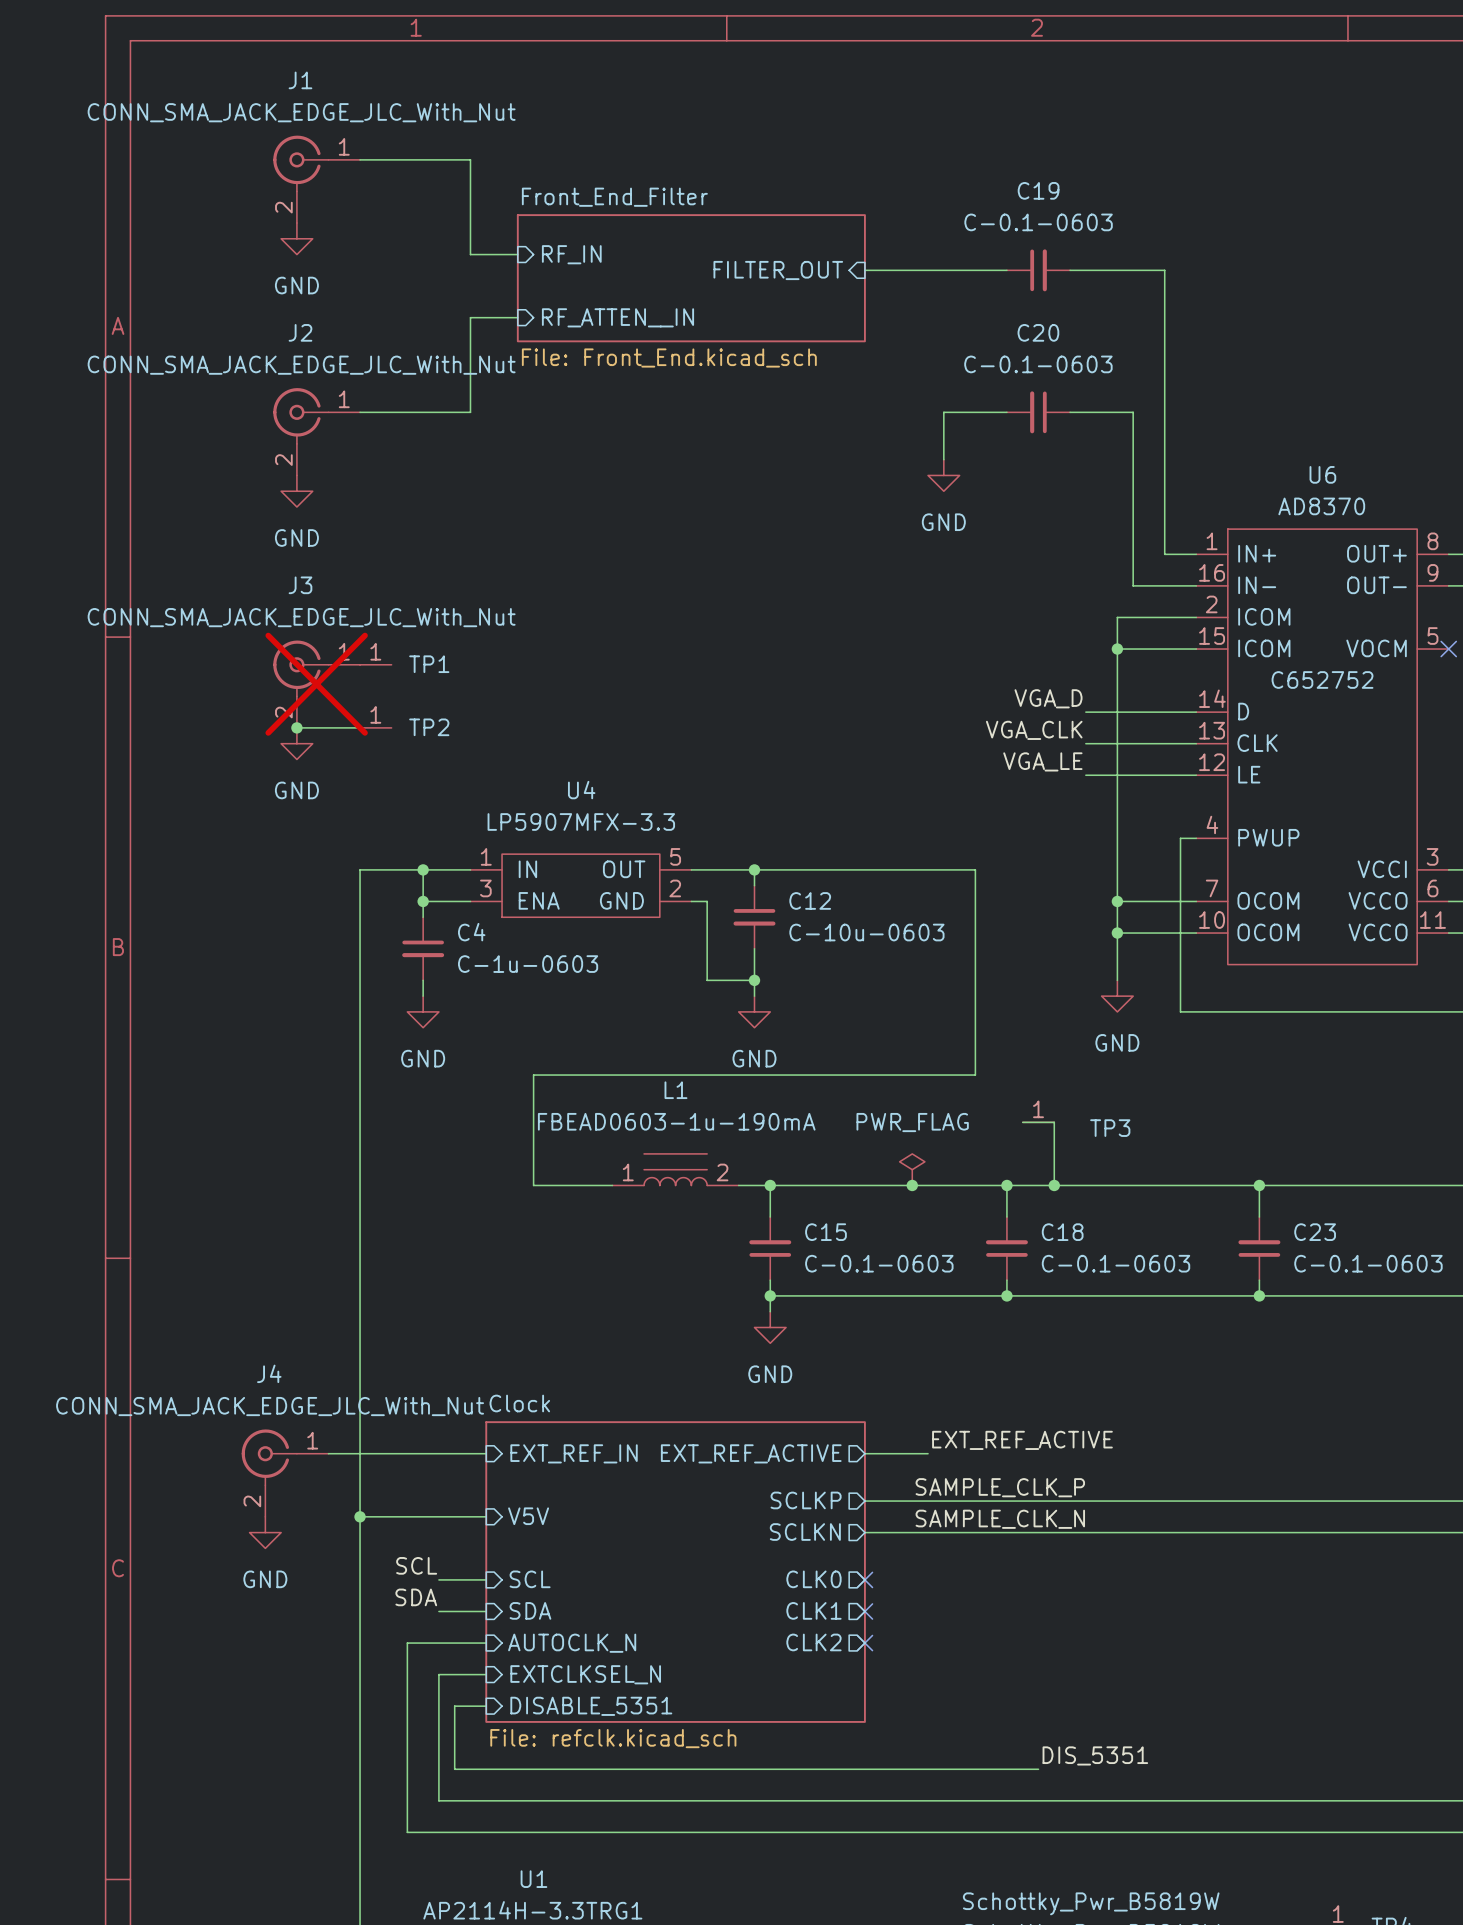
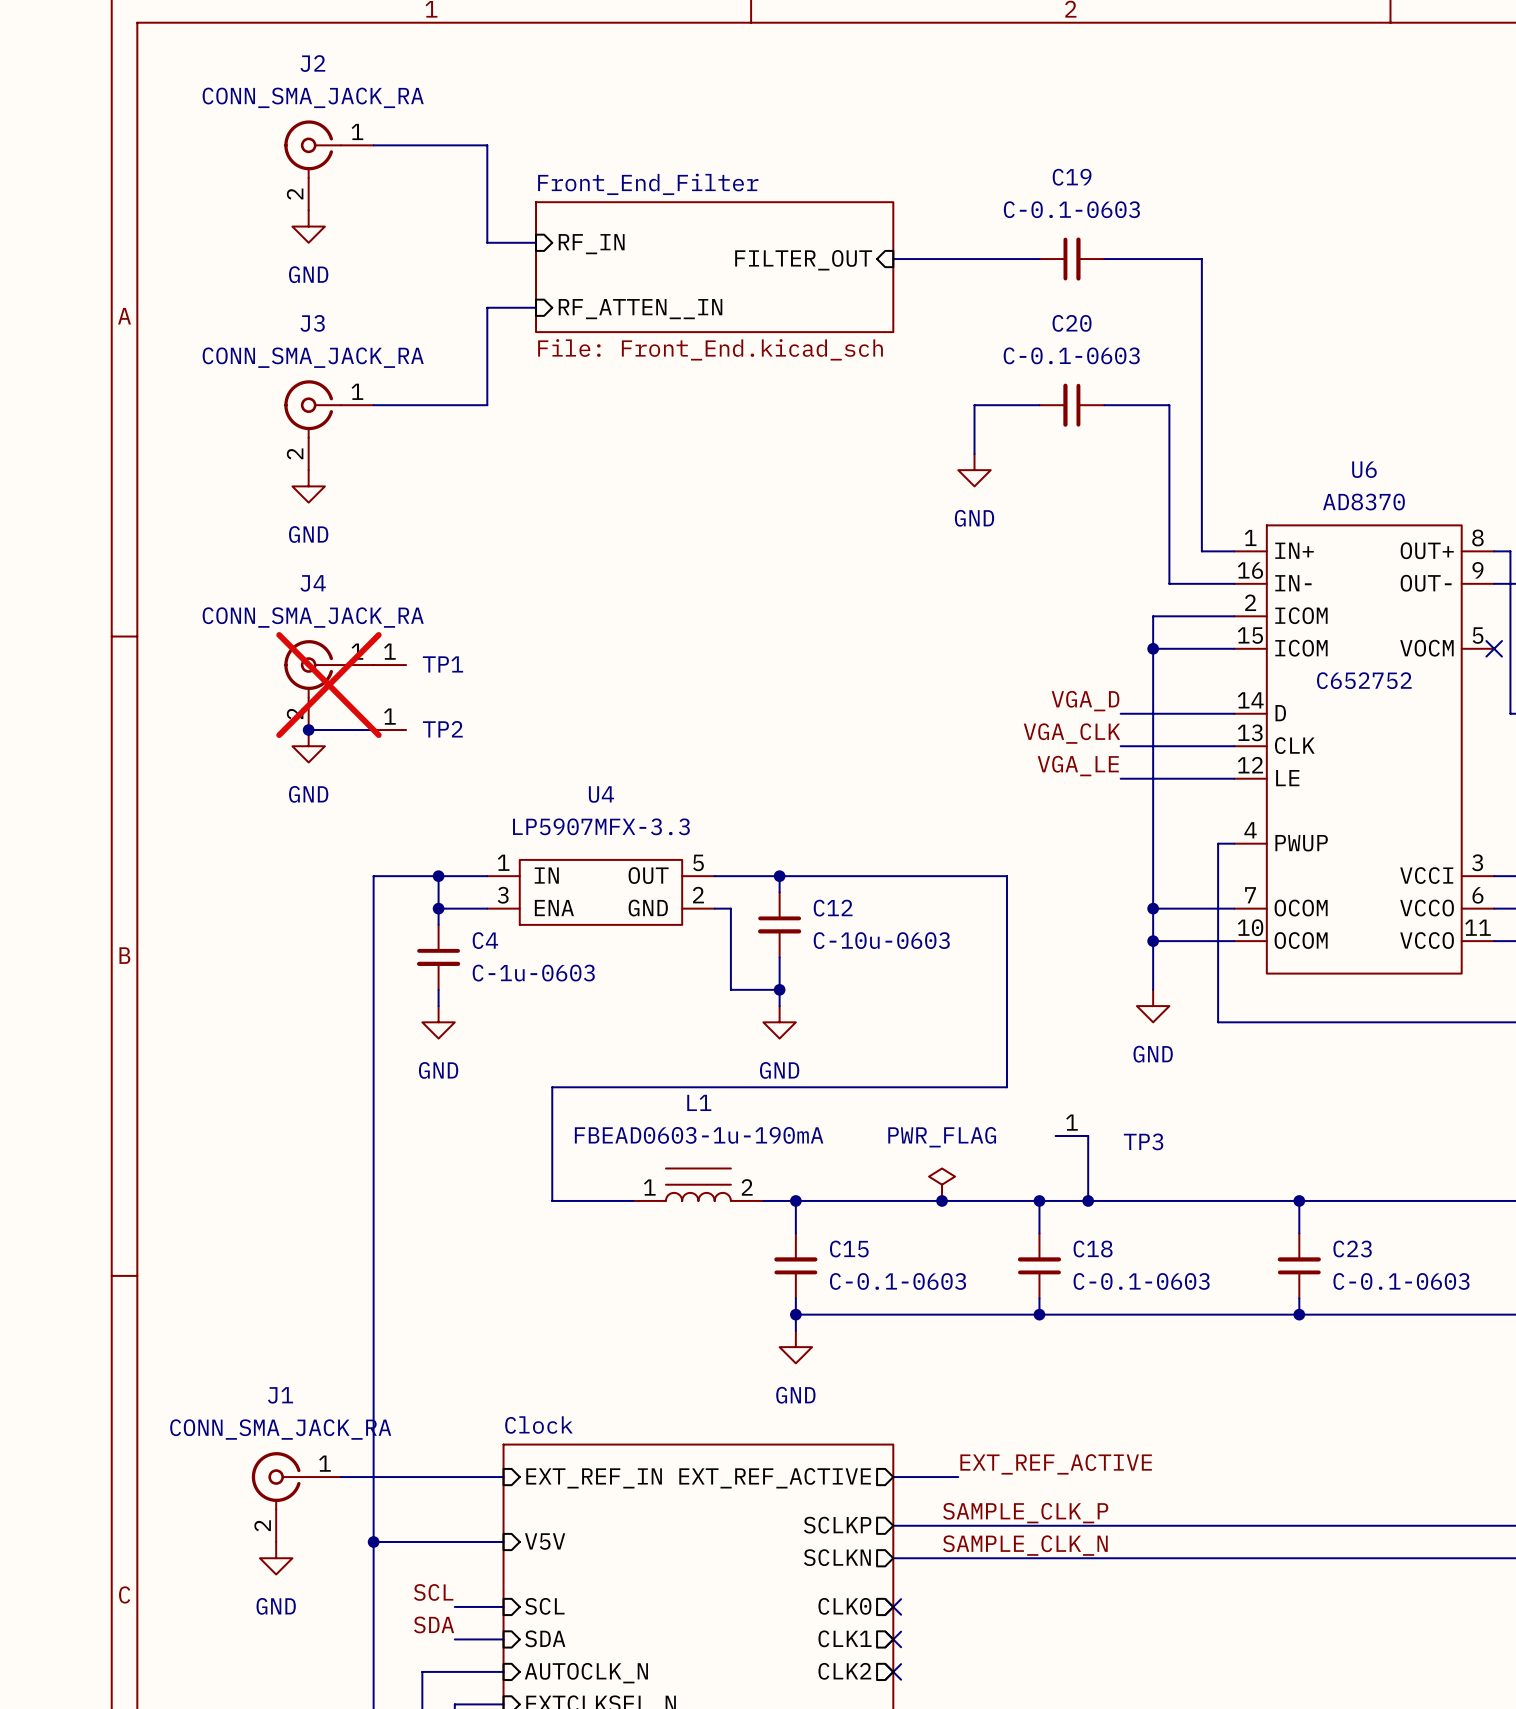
J1 name: J1 (300, 80) -> J2 (312, 63)
J1 value: CONN_SMA_JACK_EDGE_JLC_With_Nut (301, 112) -> CONN_SMA_JACK_RA (313, 97)
J2 name: J2 (300, 332) -> J3 (312, 323)
J2 value: CONN_SMA_JACK_EDGE_JLC_With_Nut (301, 365) -> CONN_SMA_JACK_RA (313, 357)
J3 name: J3 (300, 585) -> J4 (313, 583)
J3 value: CONN_SMA_JACK_EDGE_JLC_With_Nut (301, 617) -> CONN_SMA_JACK_RA (313, 617)
J4 name: J4 (269, 1373) -> J1 (280, 1395)
J4 value: CONN_SMA_JACK_EDGE_JLC_With_Nut (270, 1406) -> CONN_SMA_JACK_RA (280, 1429)

